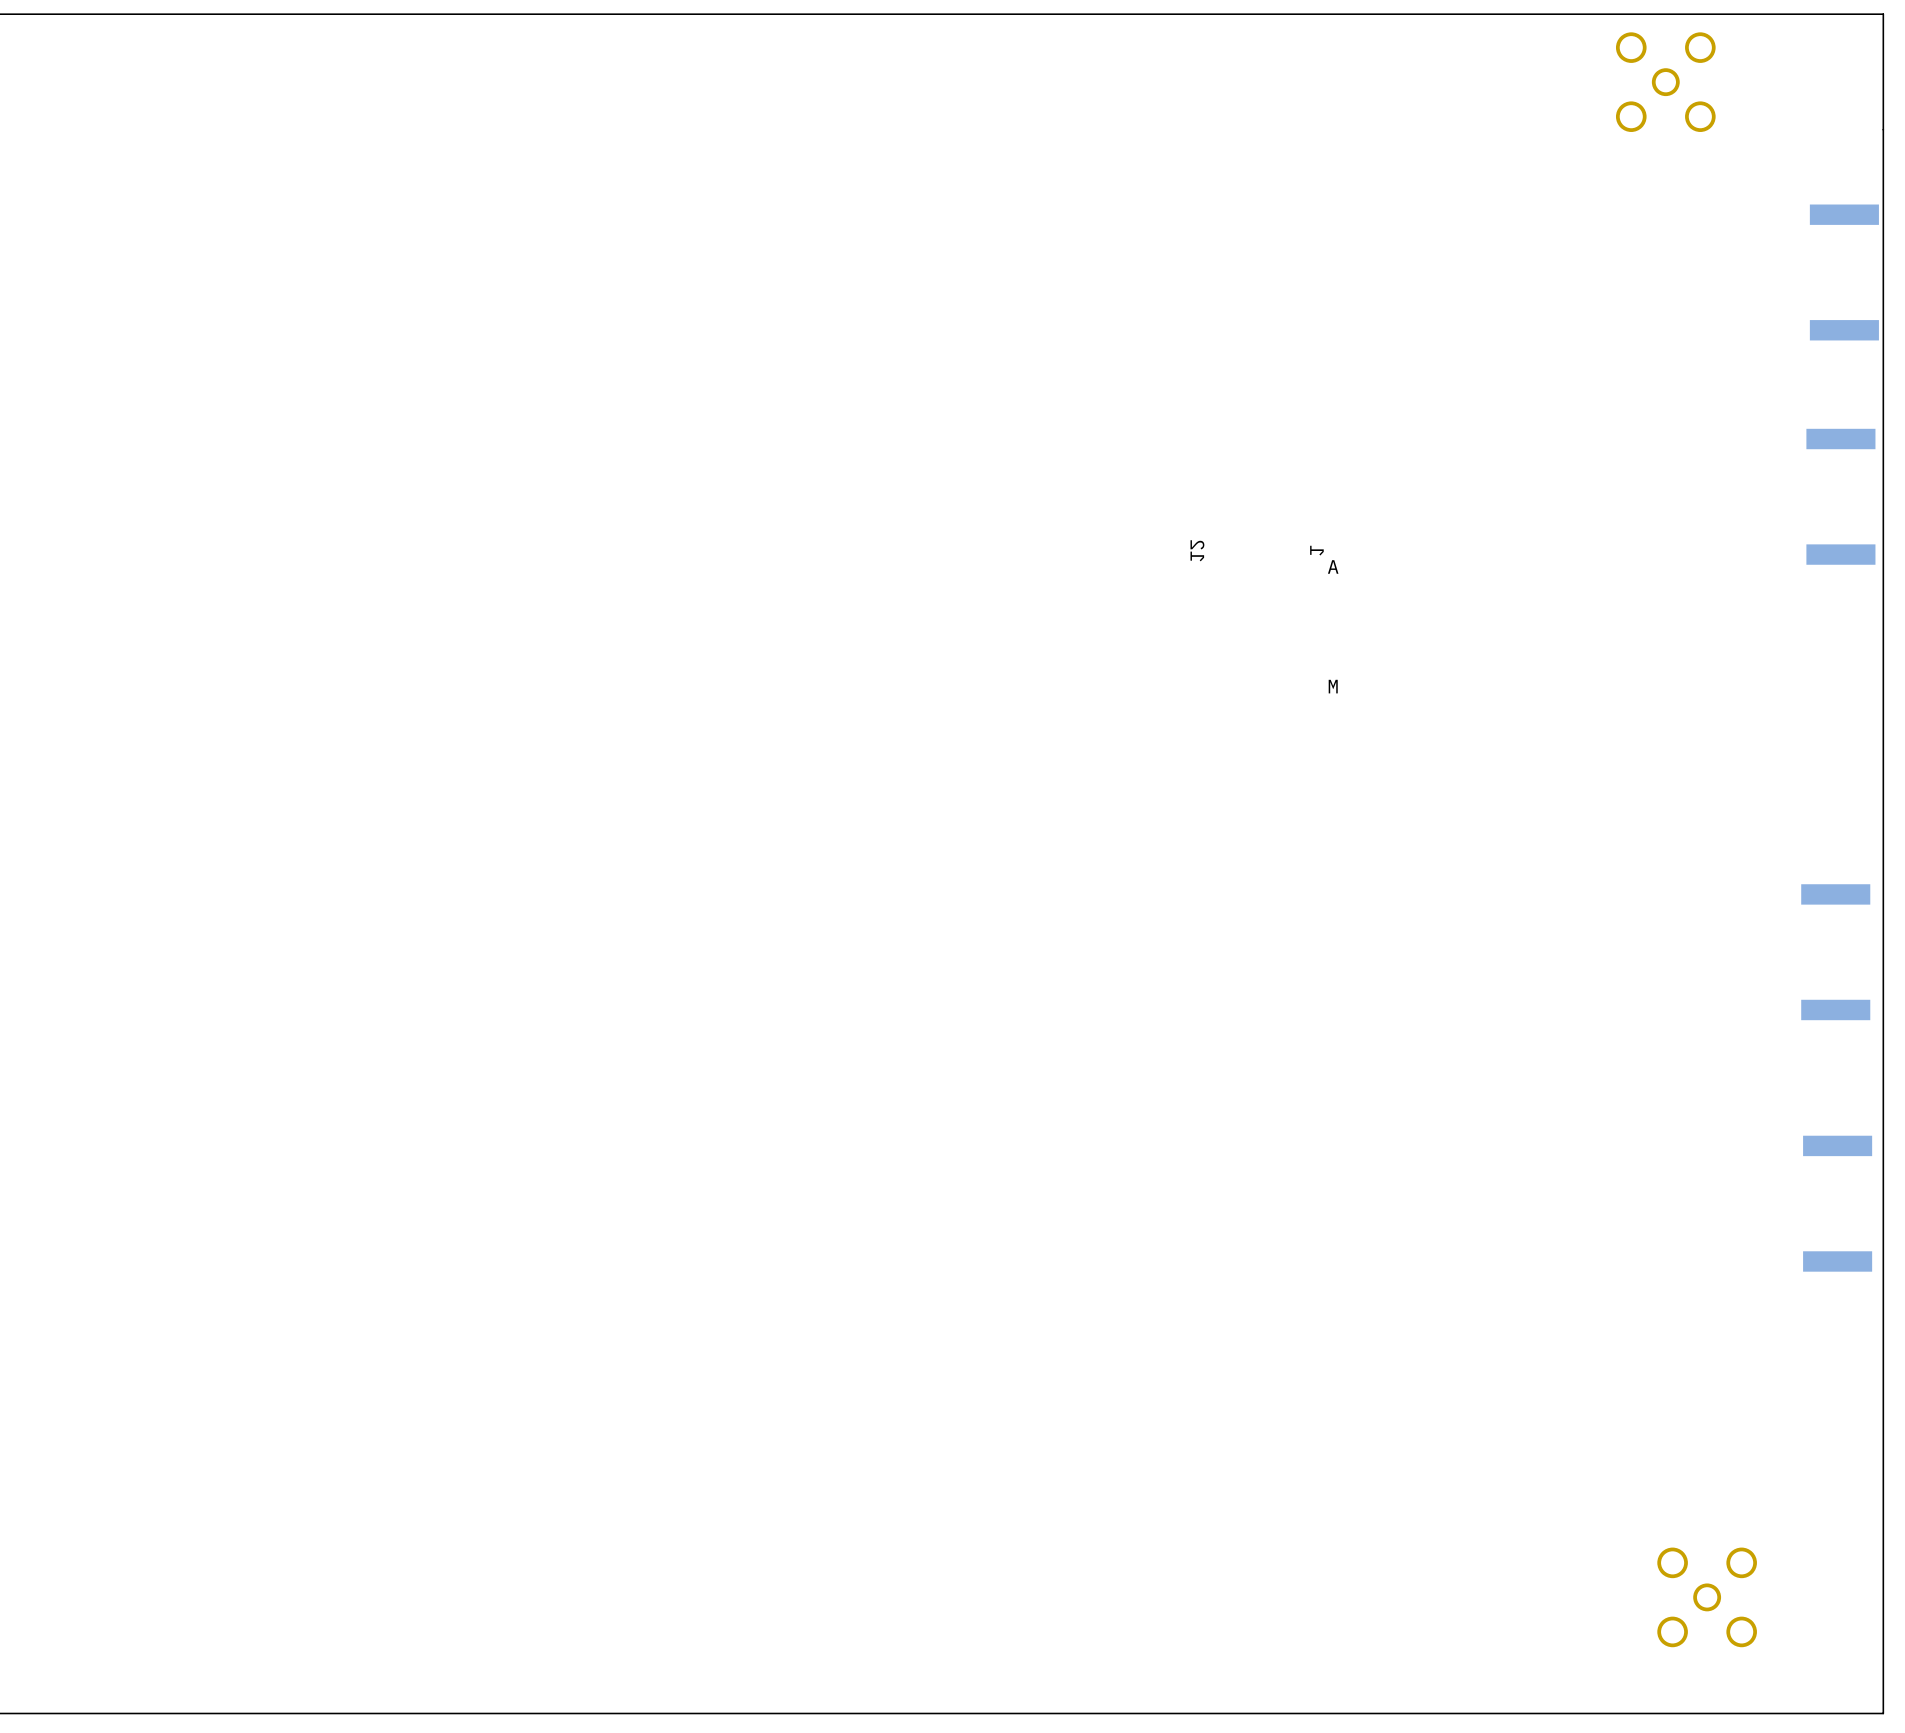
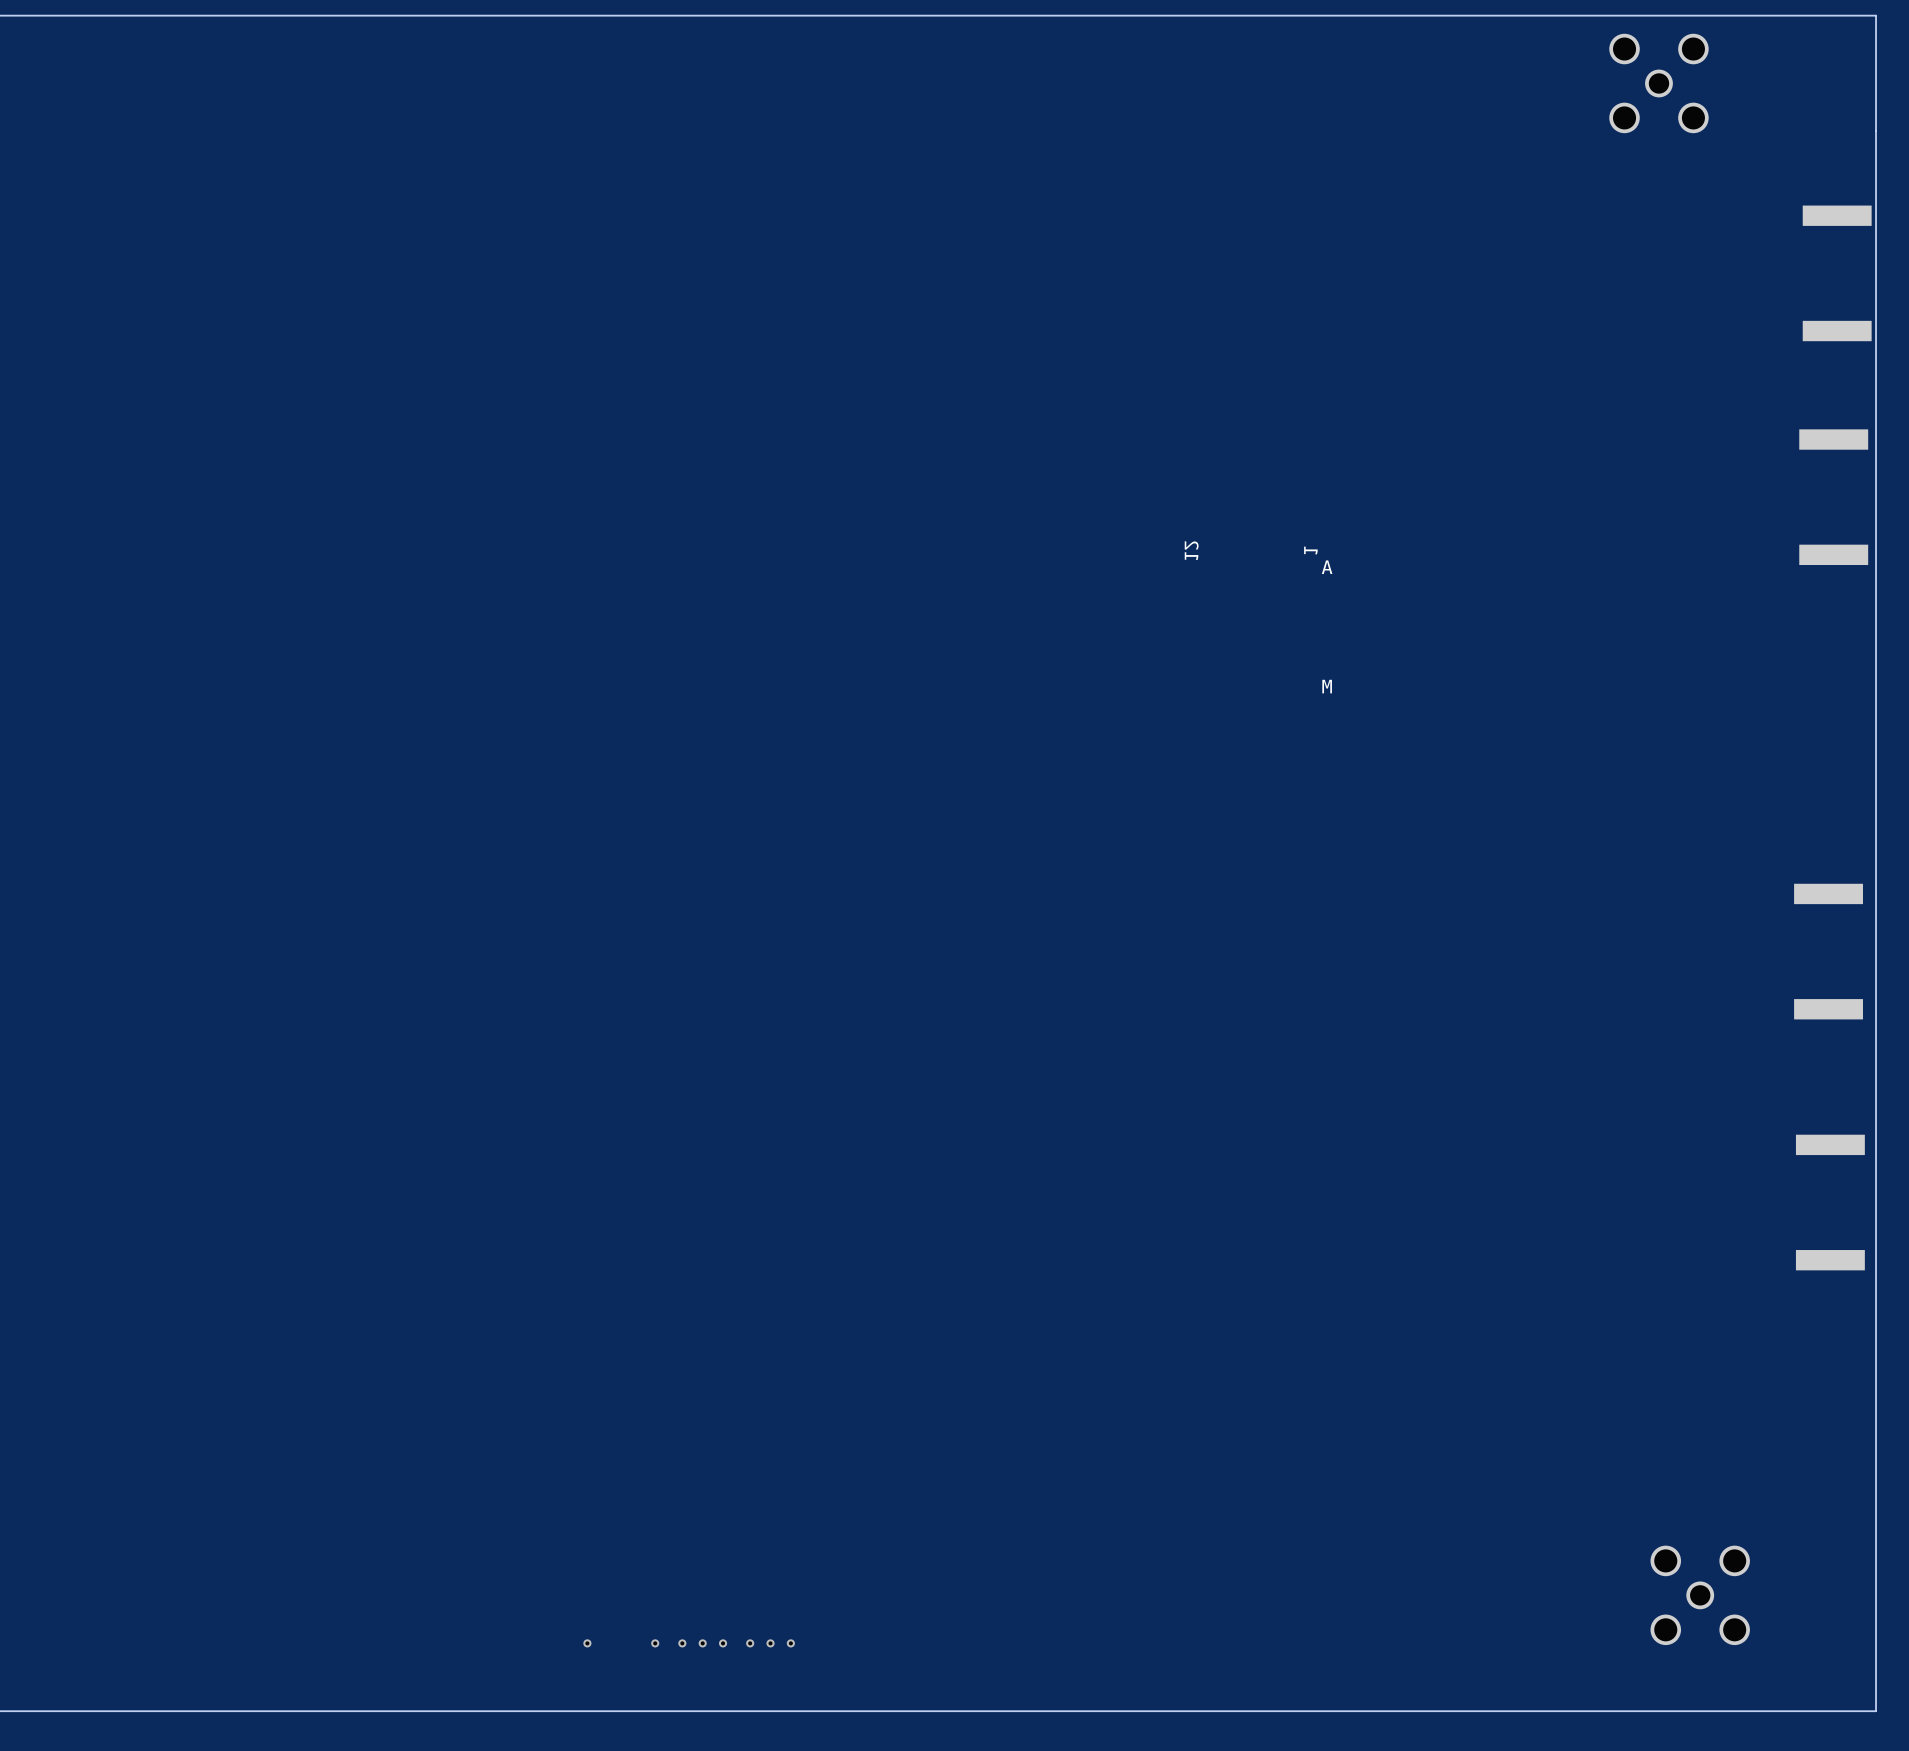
via: none -> (587, 1643)
via: none -> (655, 1643)
via: none -> (682, 1643)
via: none -> (702, 1643)
via: none -> (723, 1643)
via: none -> (750, 1643)
via: none -> (770, 1643)
via: none -> (790, 1643)

